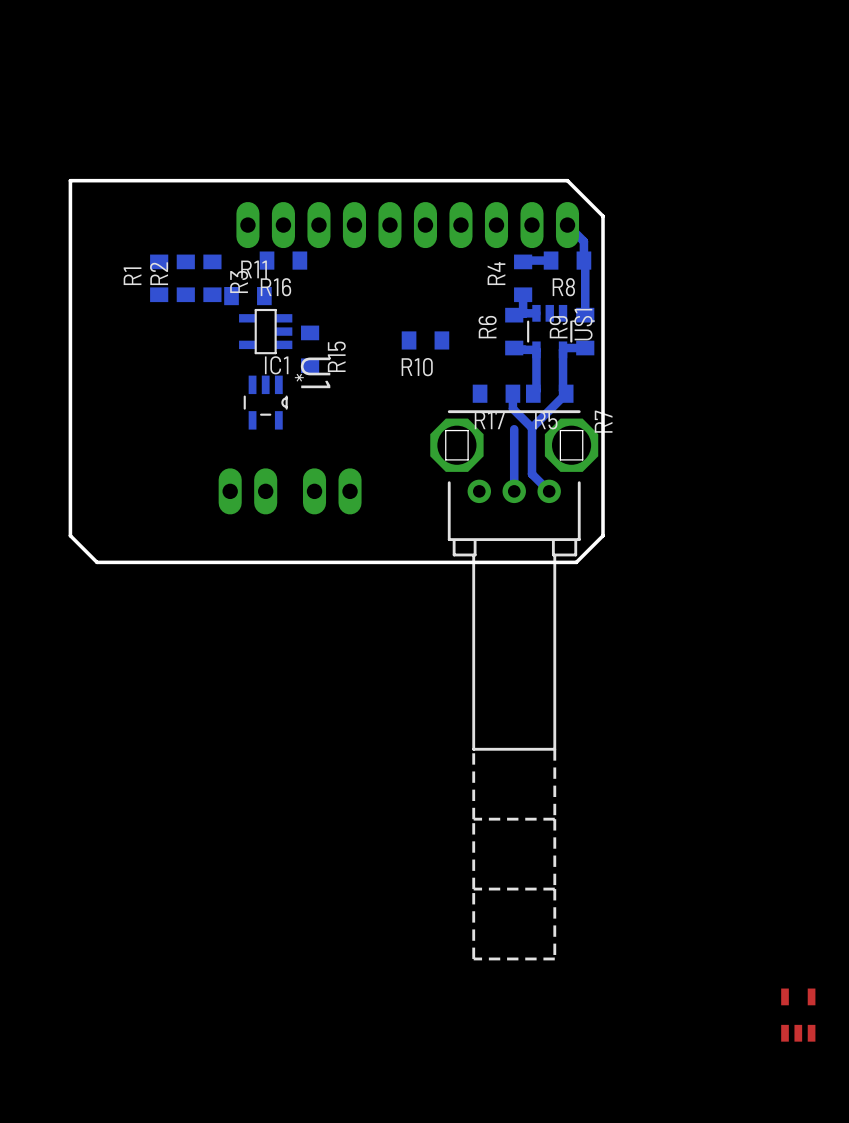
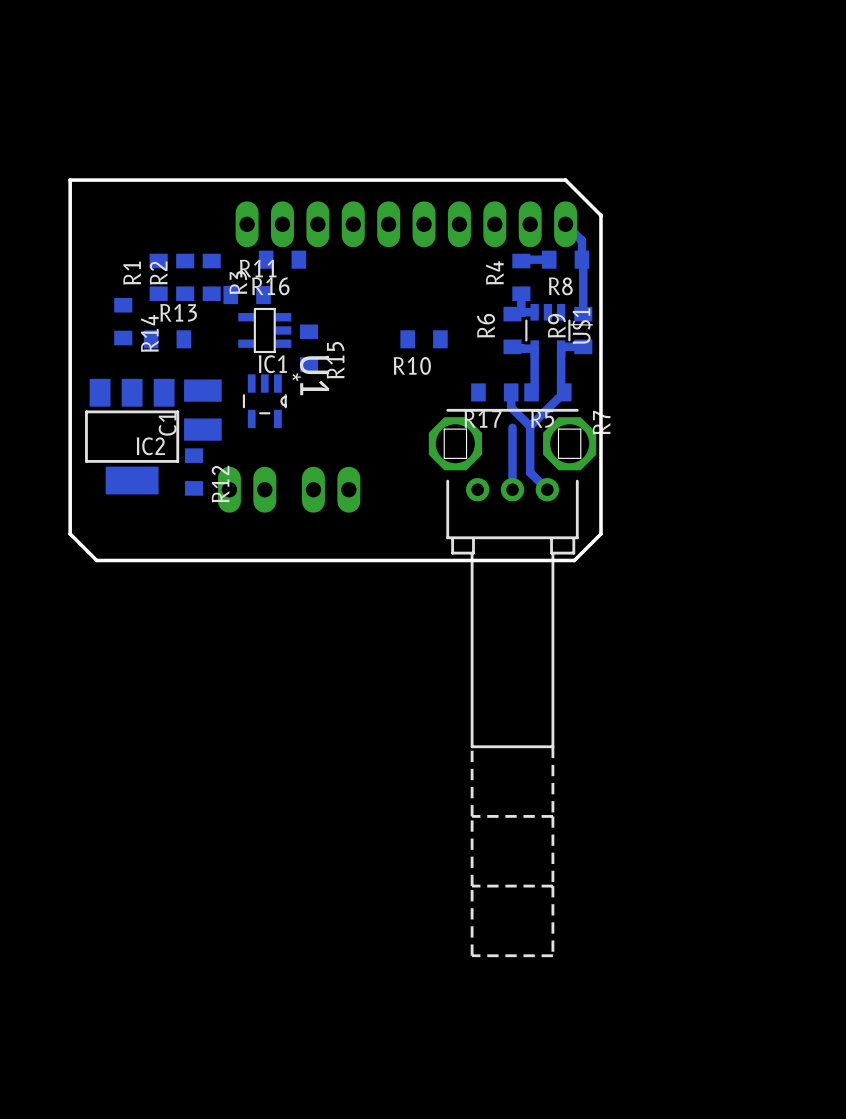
R14: none -> (123, 321)
R13: none -> (167, 339)
C1: none -> (202, 410)
IC2: none -> (132, 436)
R12: none -> (194, 472)
part: (798, 1015) -> none

